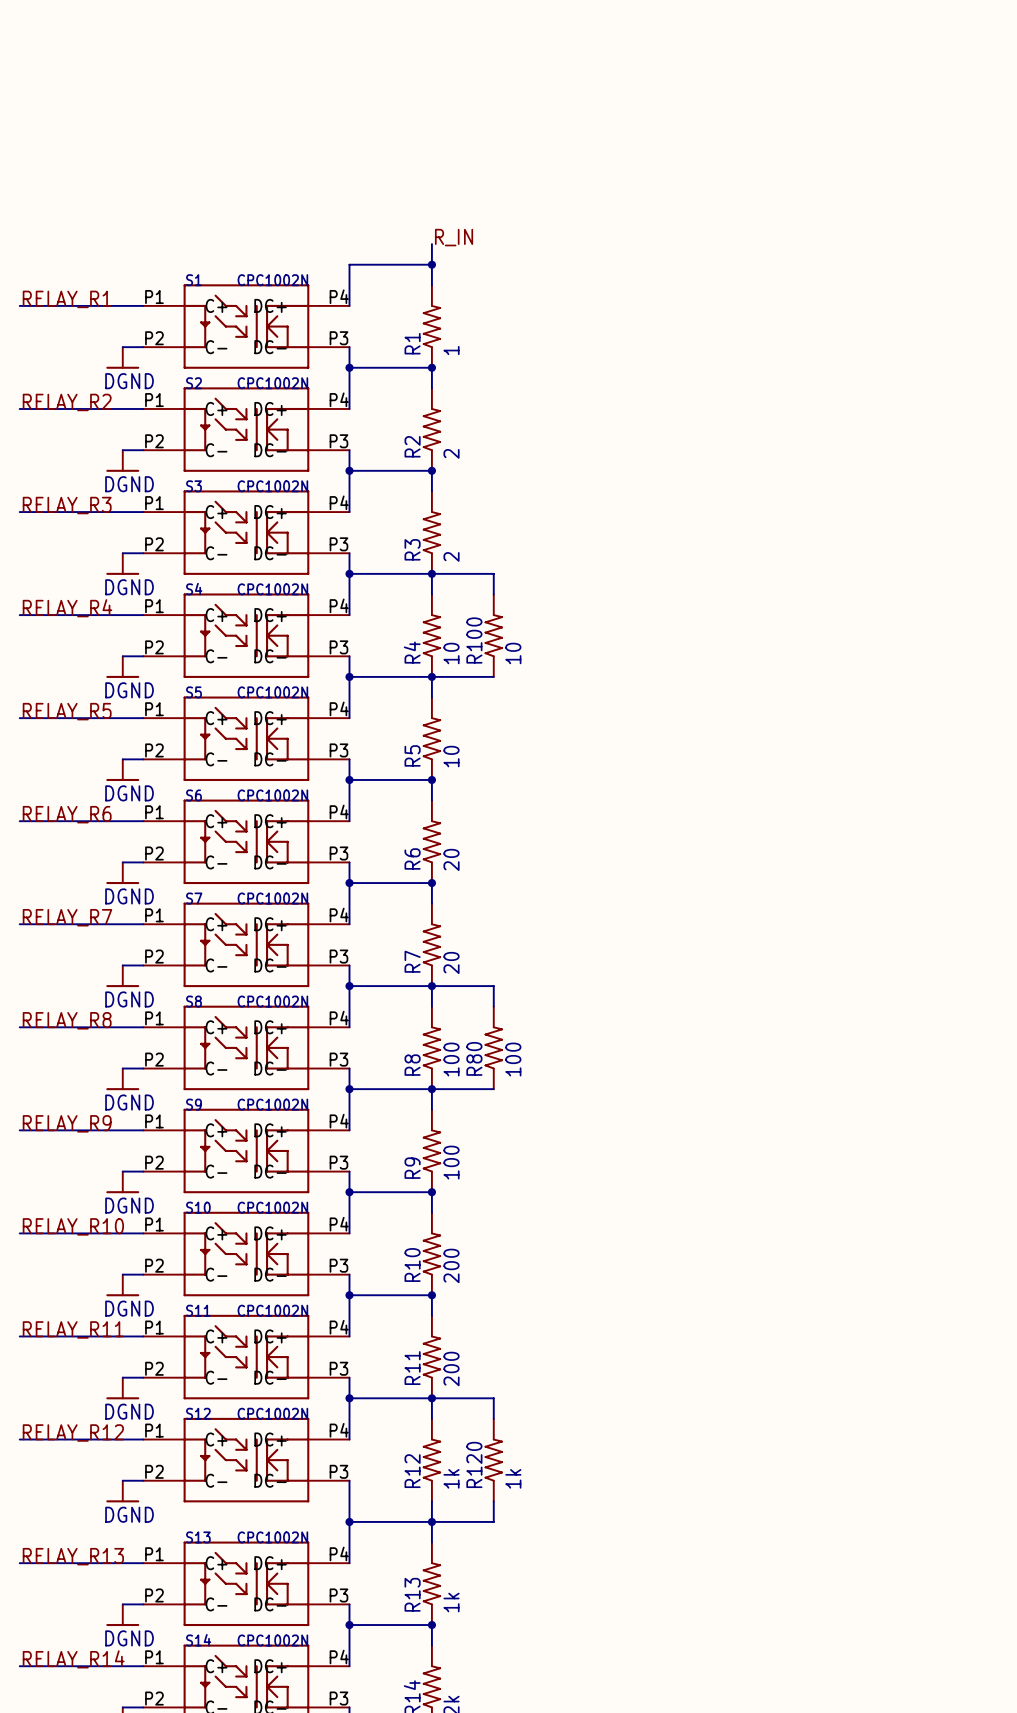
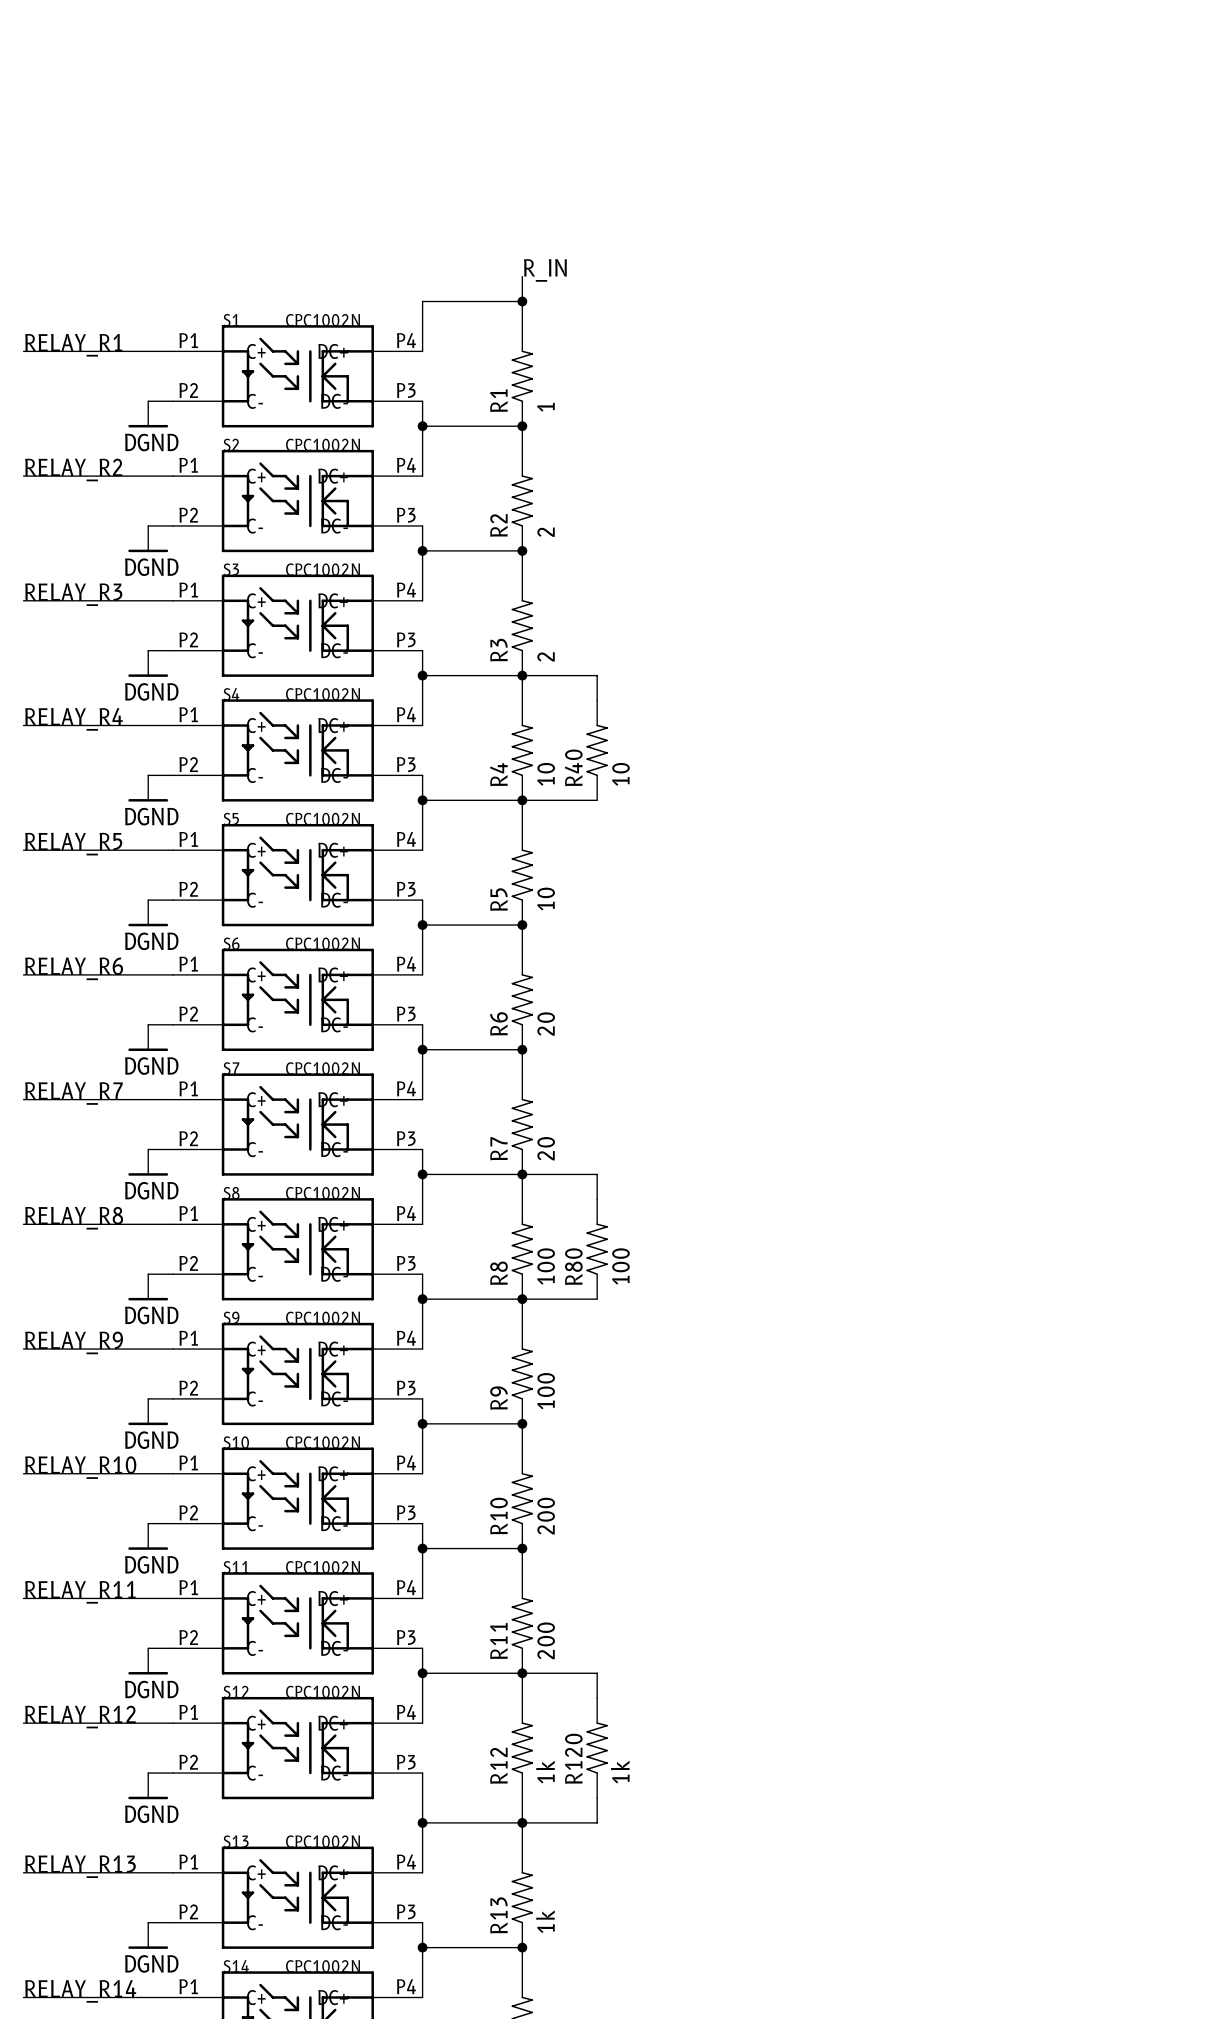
R100 name: R100 (474, 640) -> R40 (573, 767)

